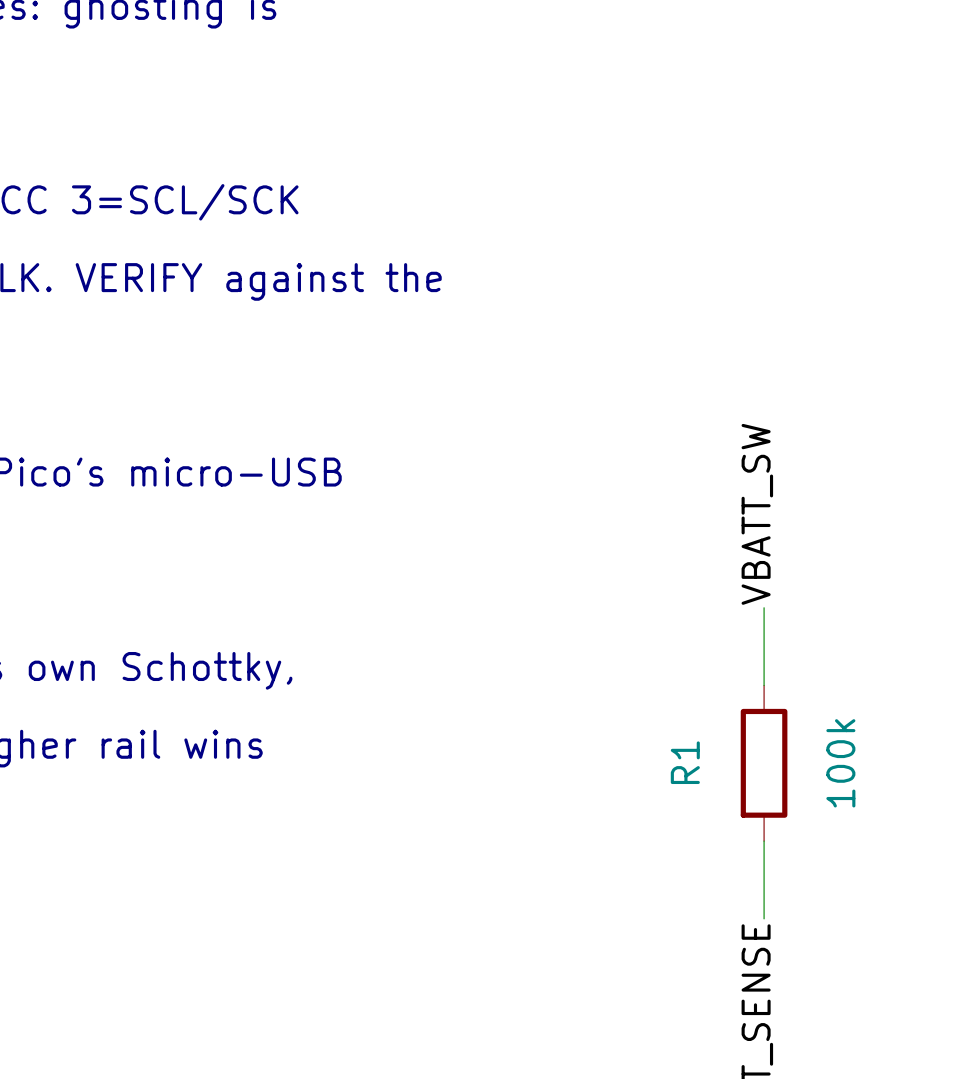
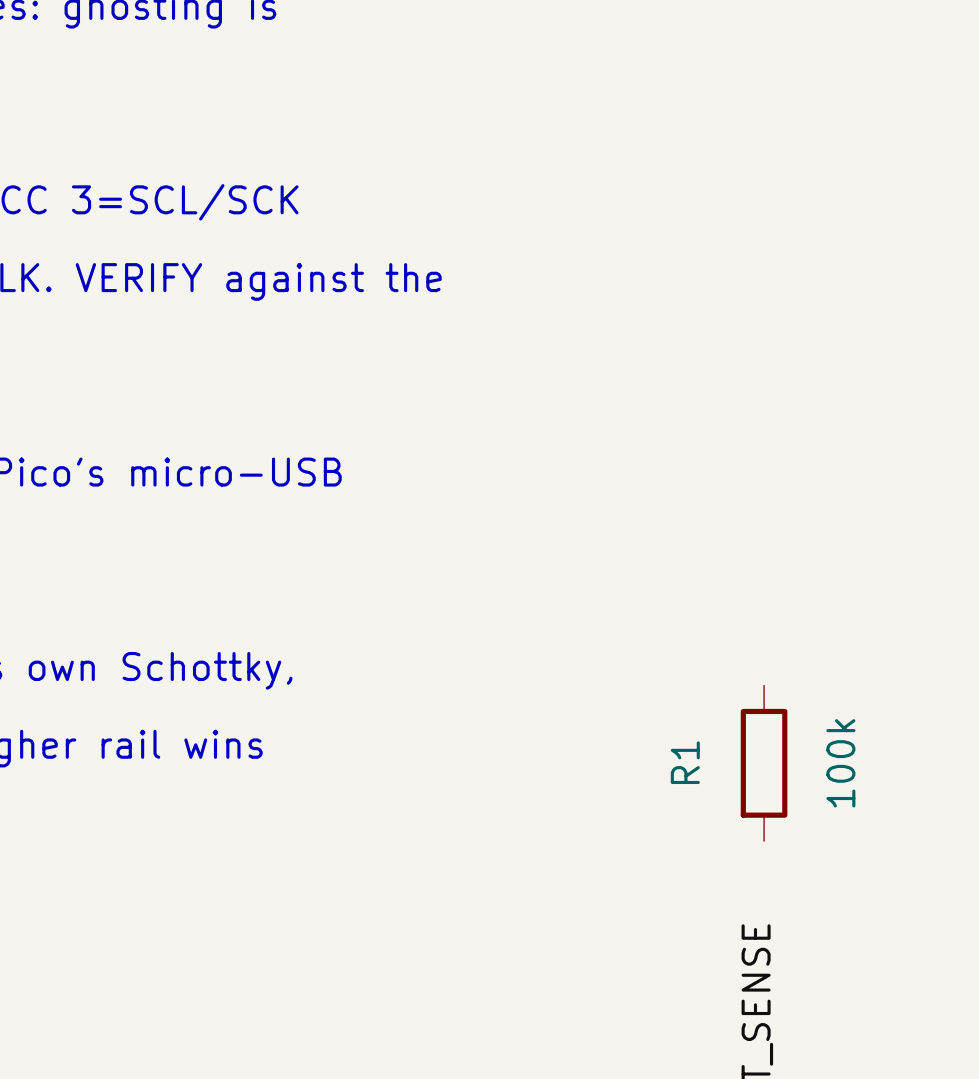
label: VBATT_SW (757, 514) -> none
wire: (764, 607) (764, 685) -> none
wire: (764, 841) (764, 918) -> none

